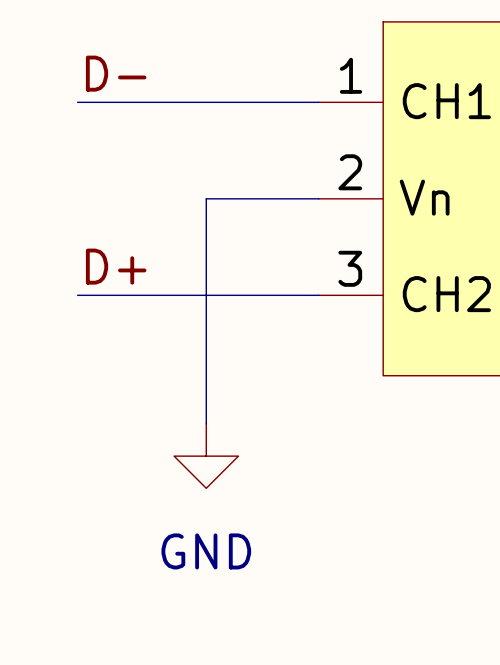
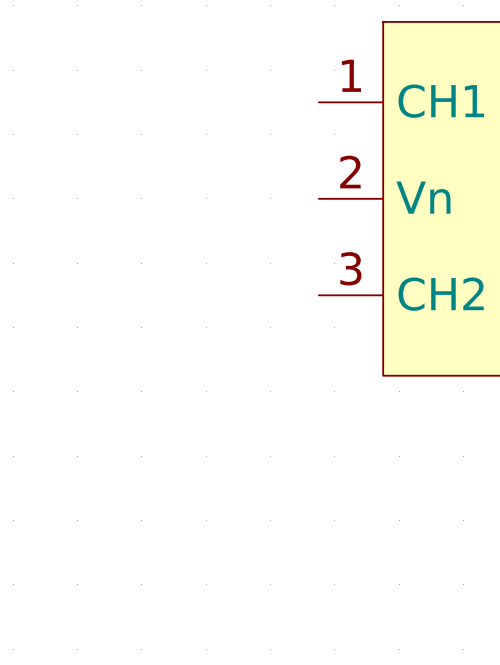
label: D- (116, 73) -> none
wire: (77, 102) (318, 102) -> none
wire: (318, 198) (206, 198) (206, 423) -> none
label: D+ (116, 266) -> none
wire: (77, 295) (318, 295) -> none
power symbol: GND (206, 456) -> none

